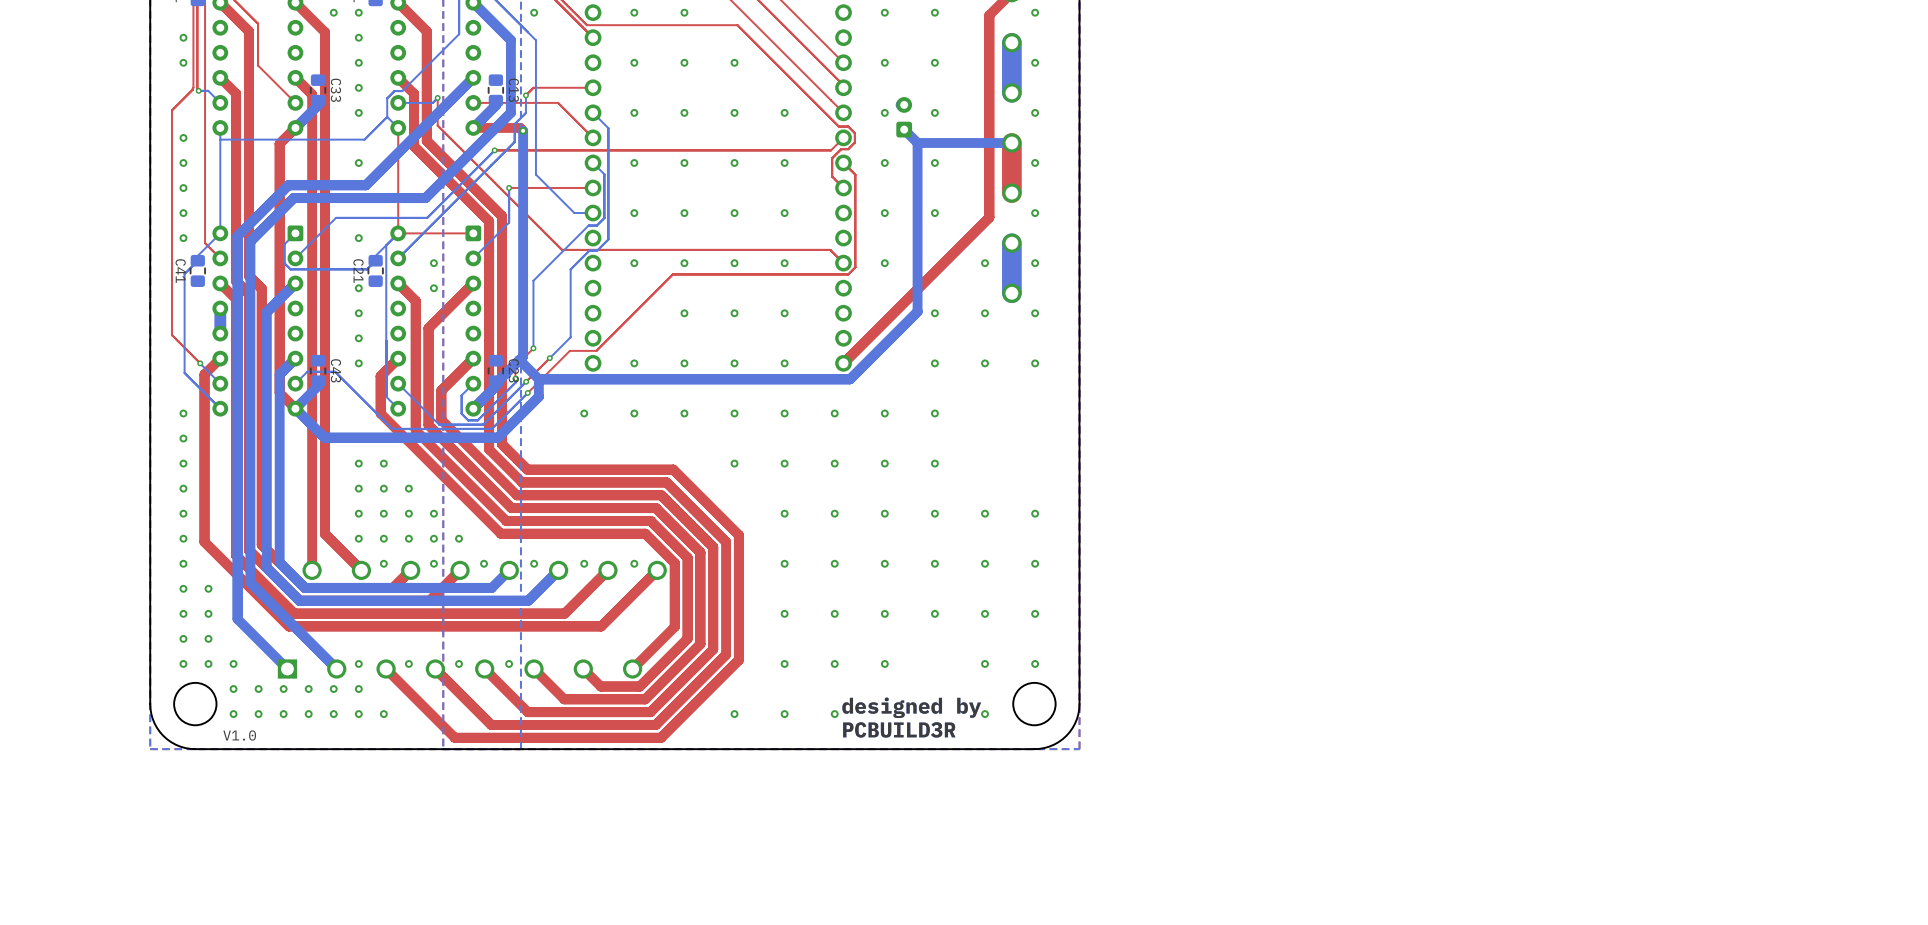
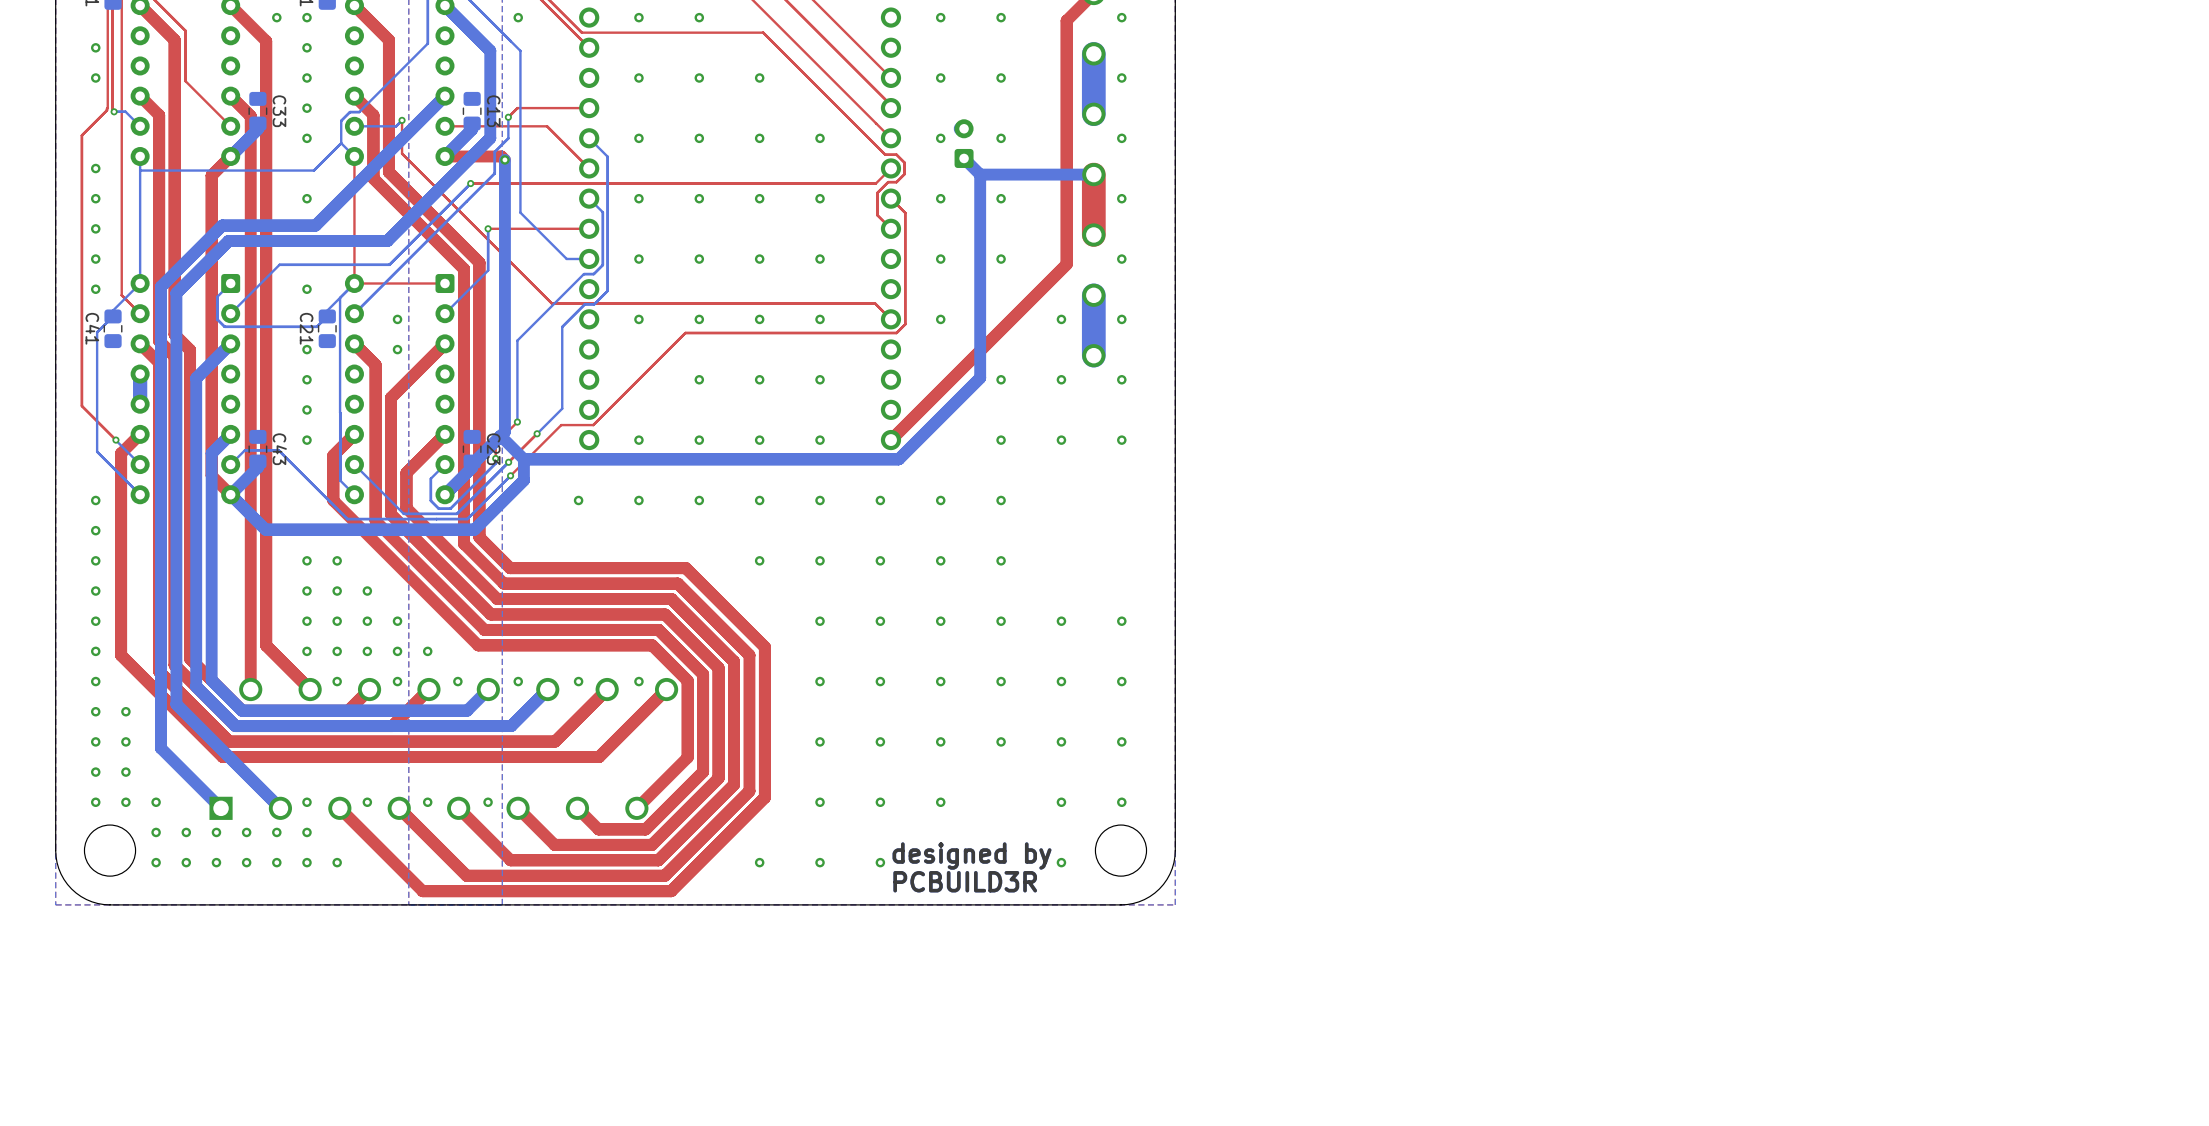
text: V1.0 (239, 735) -> none

